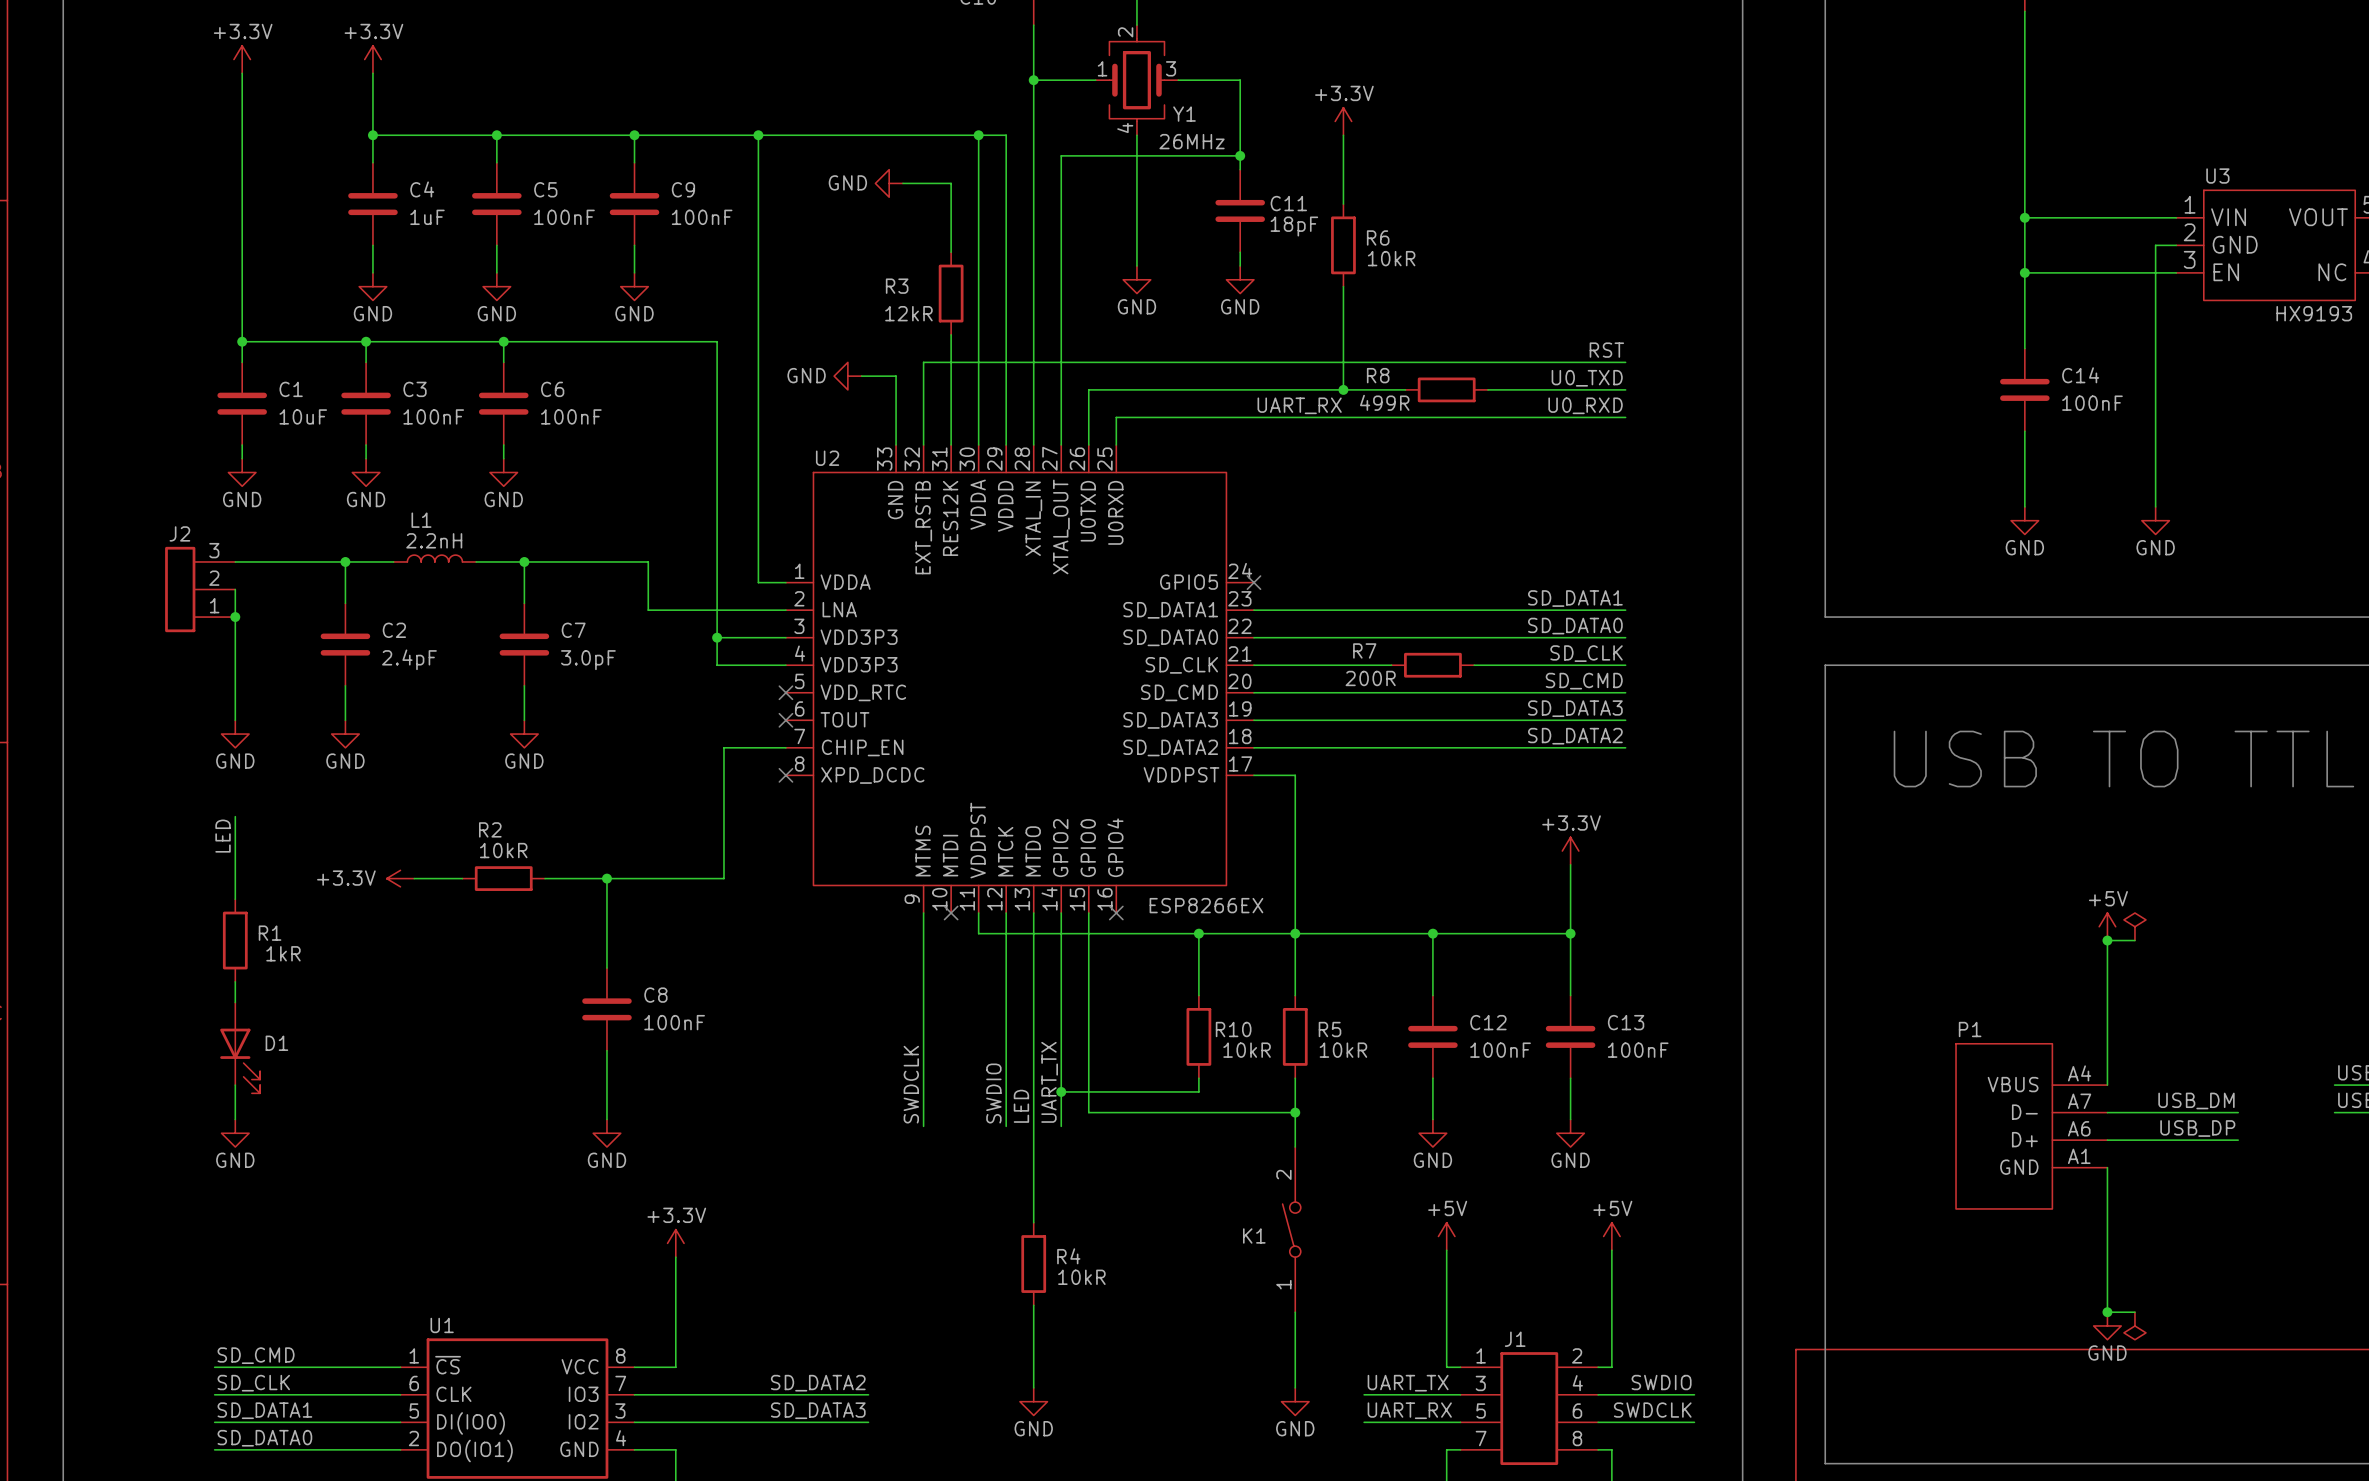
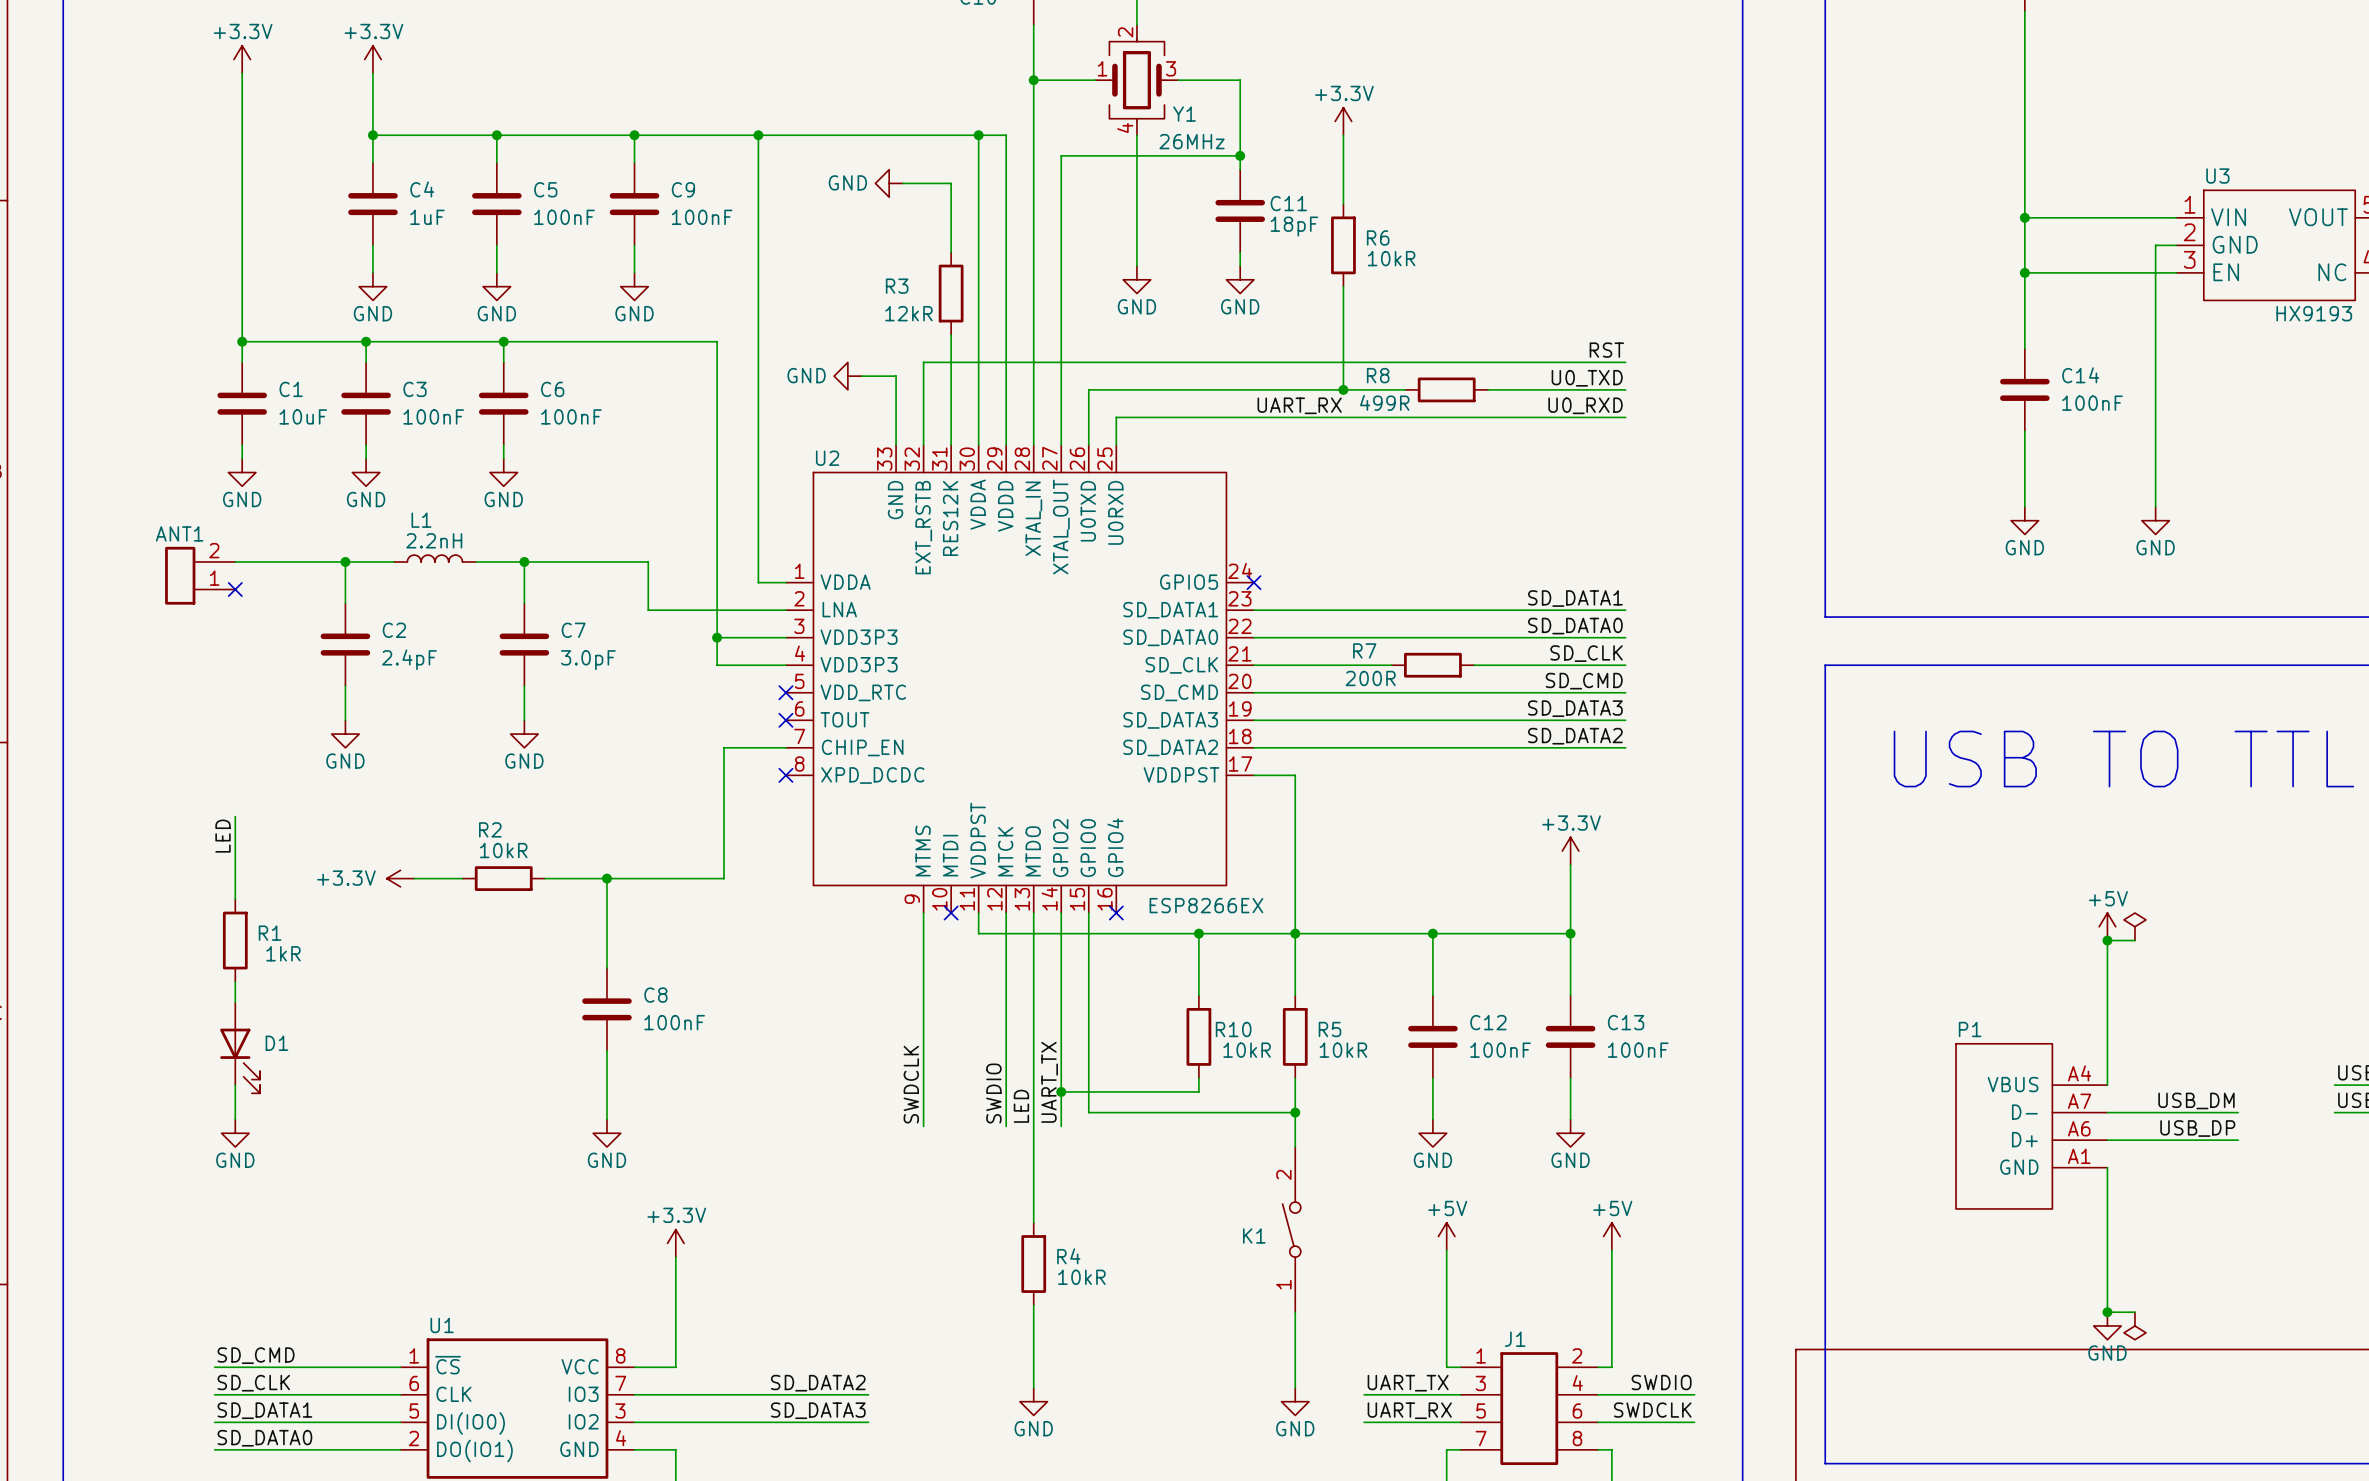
ANT1: none -> (200, 575)
J2: (200, 589) -> none
wire: (235, 589) (235, 720) -> none
no-connect mark: none -> (235, 589)
junction: (235, 617) -> none
power symbol: GND (235, 734) -> none

